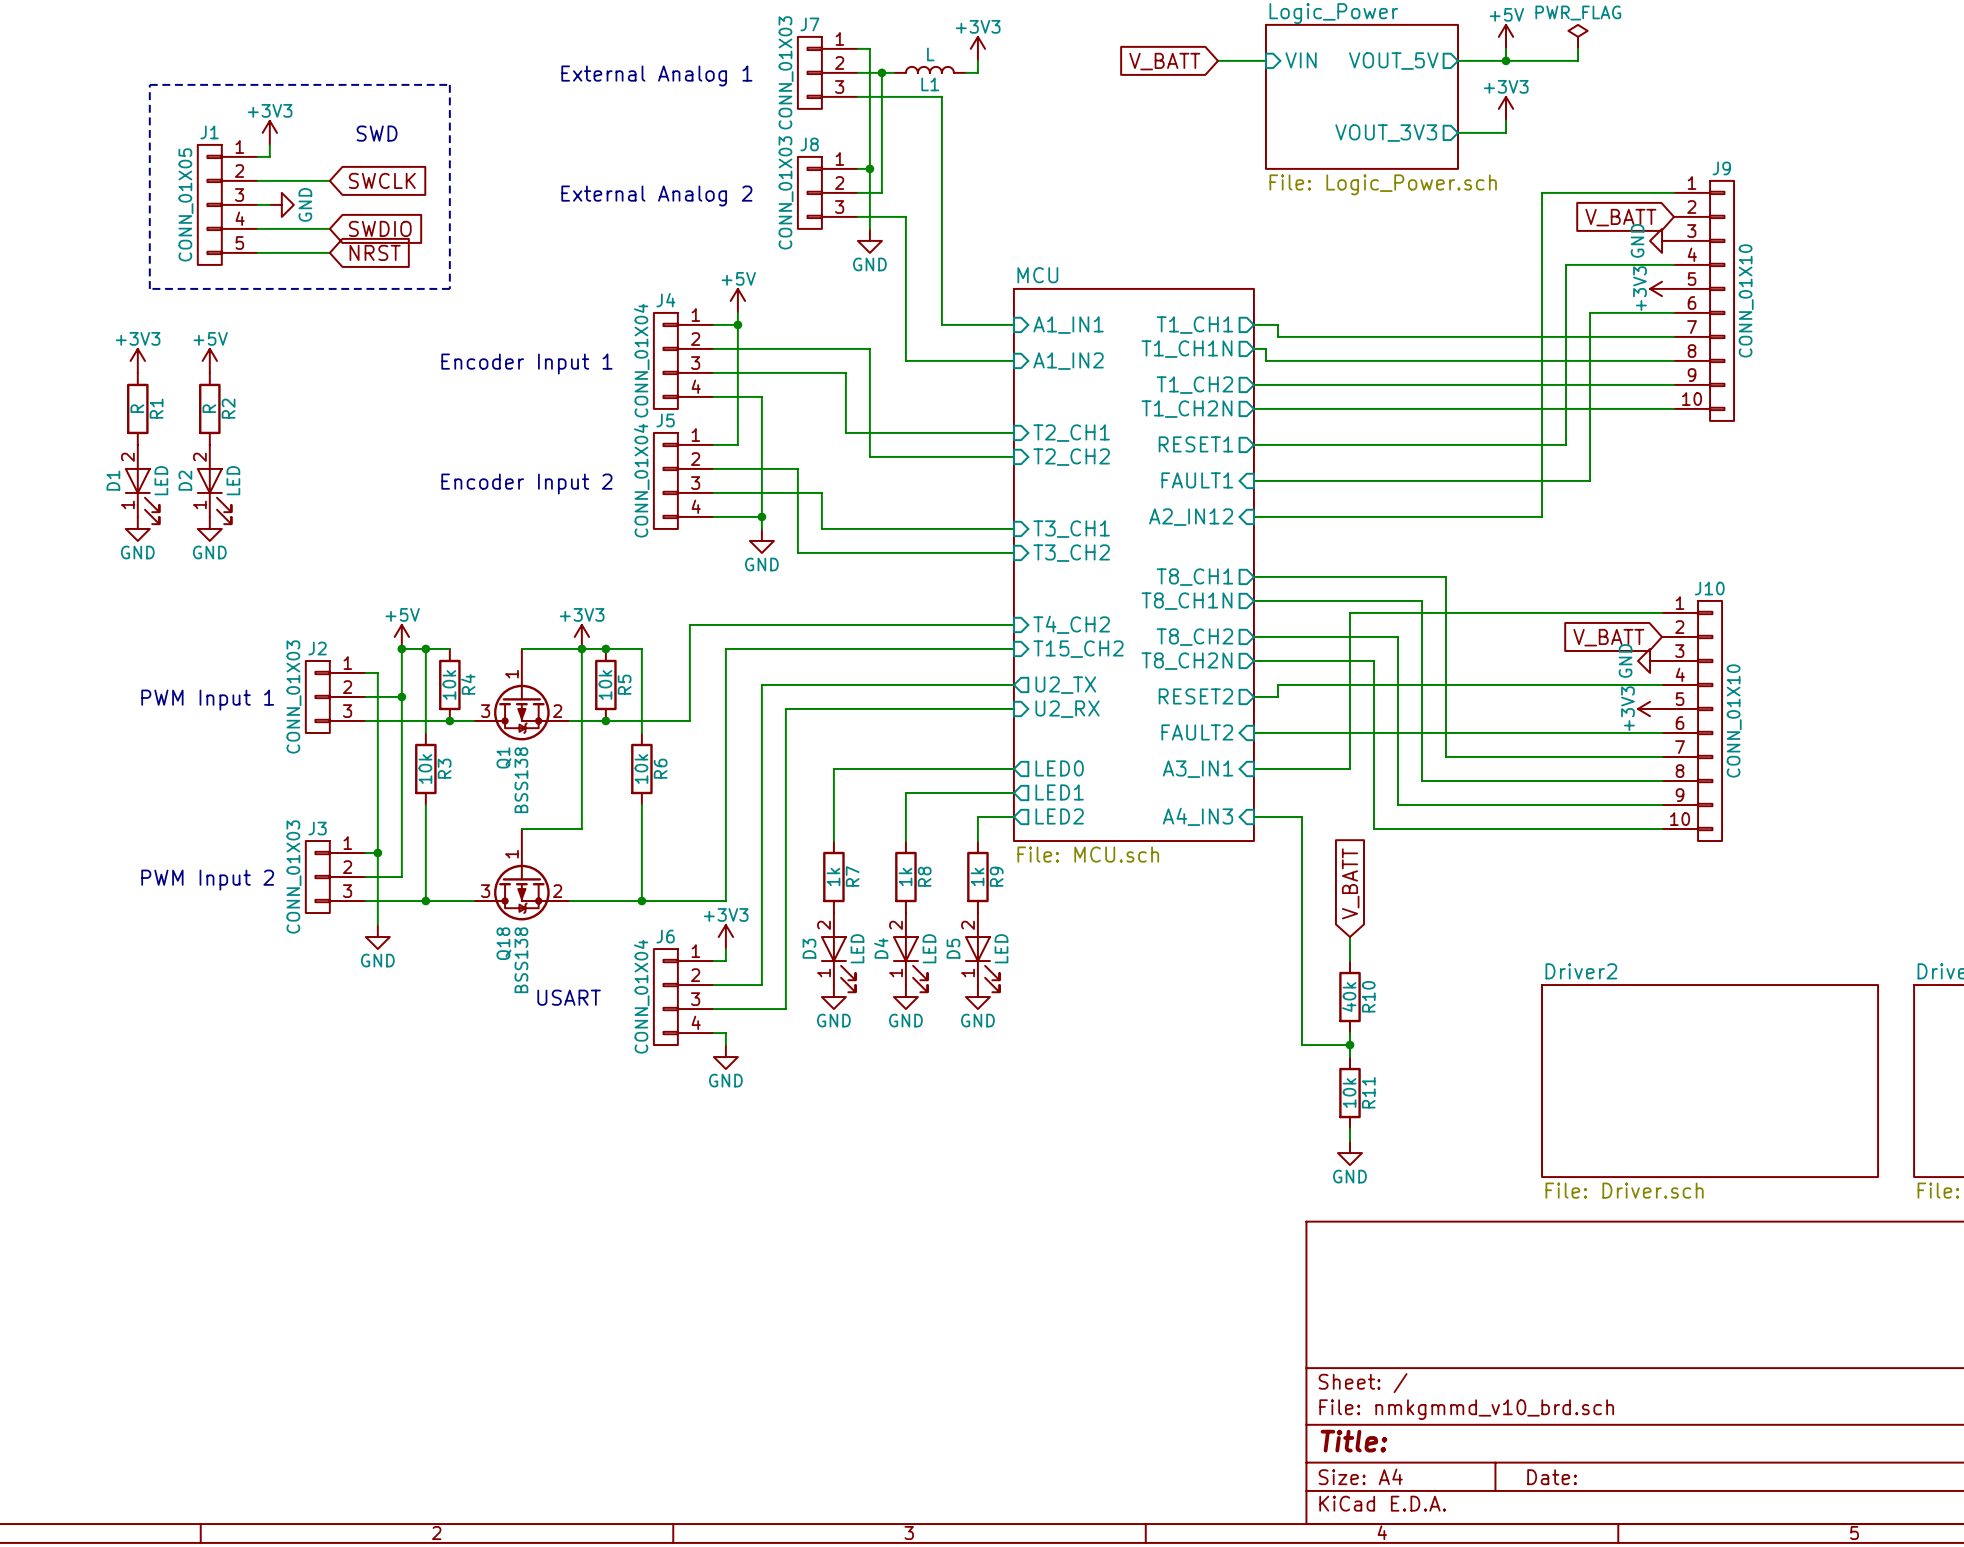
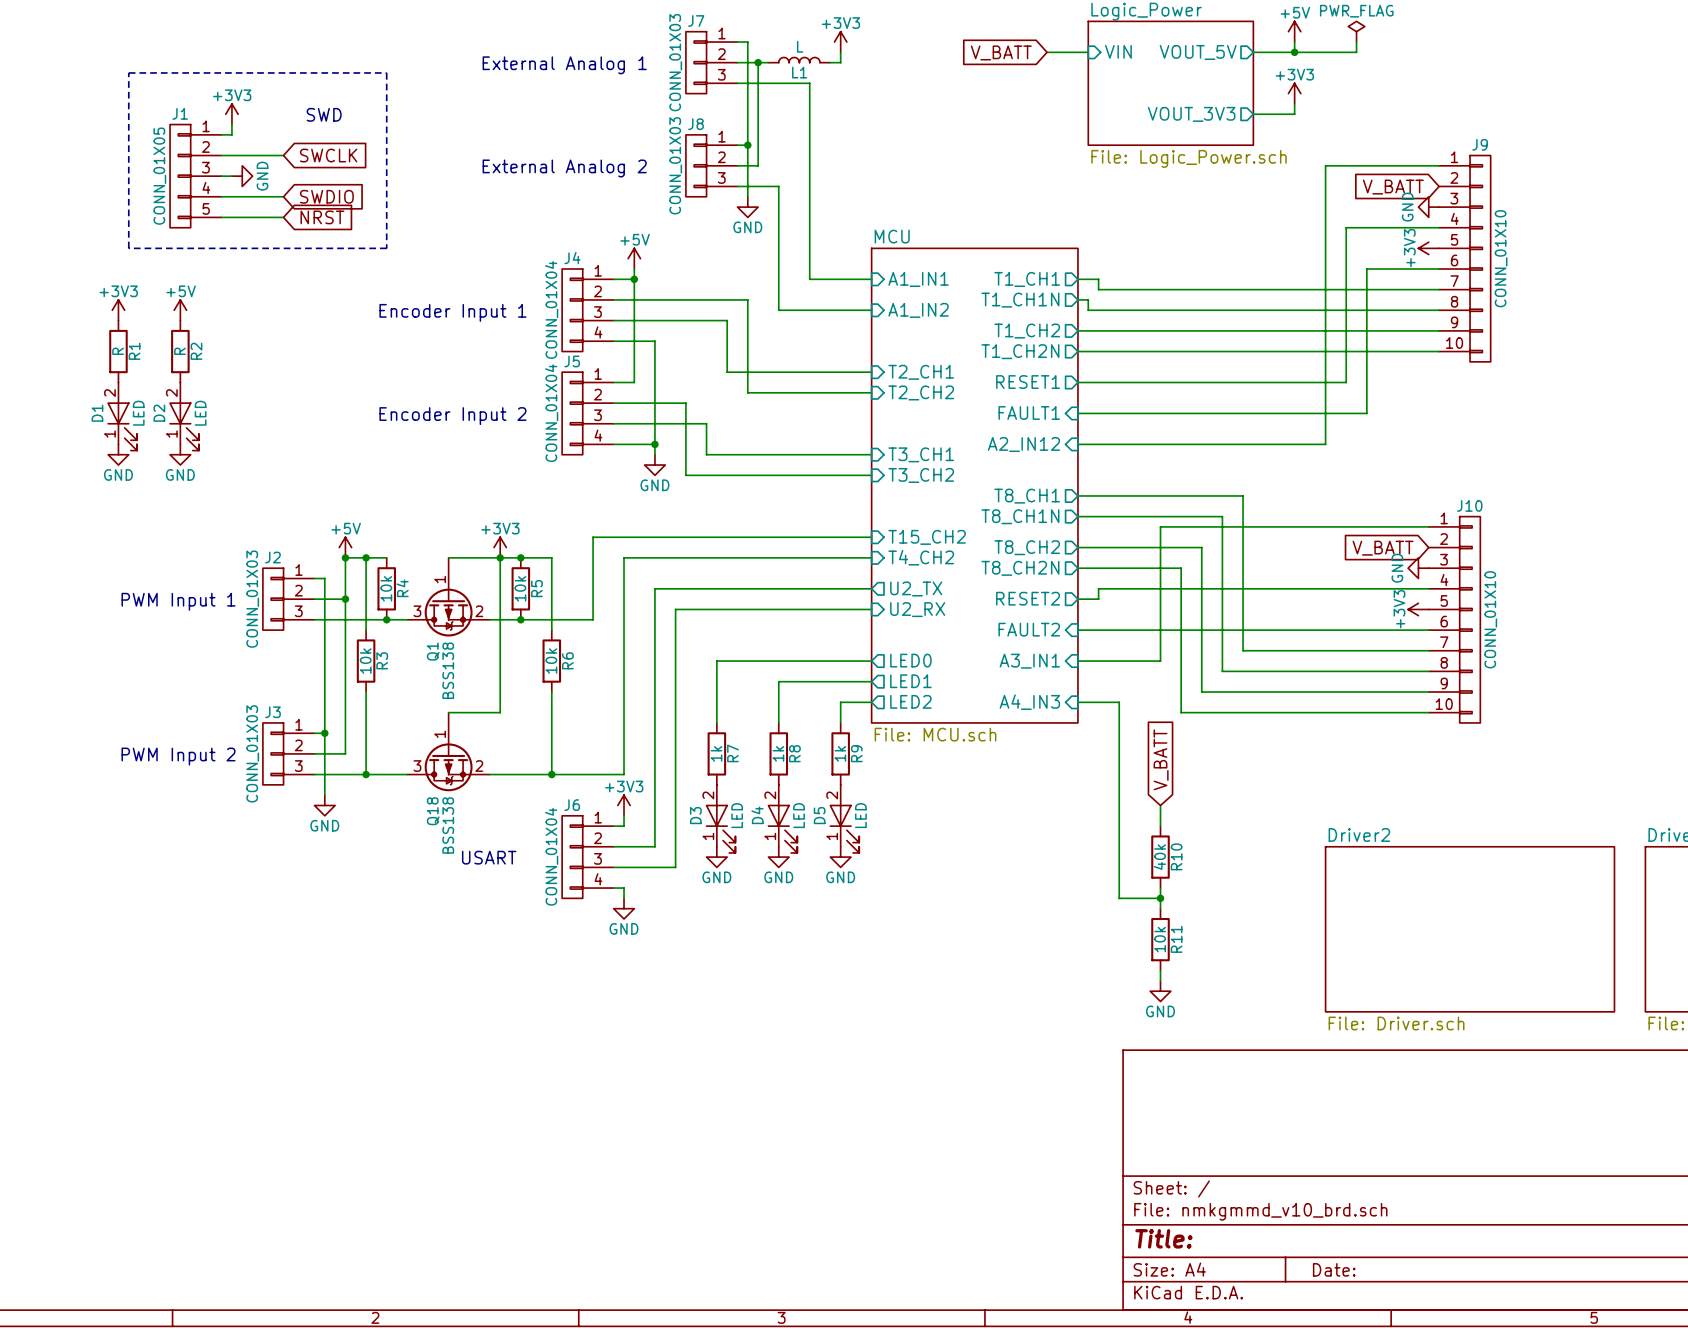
sheet pin: T4_CH2 (1071, 624) -> T15_CH2 (927, 537)
sheet pin: T15_CH2 (1078, 649) -> T4_CH2 (921, 557)

